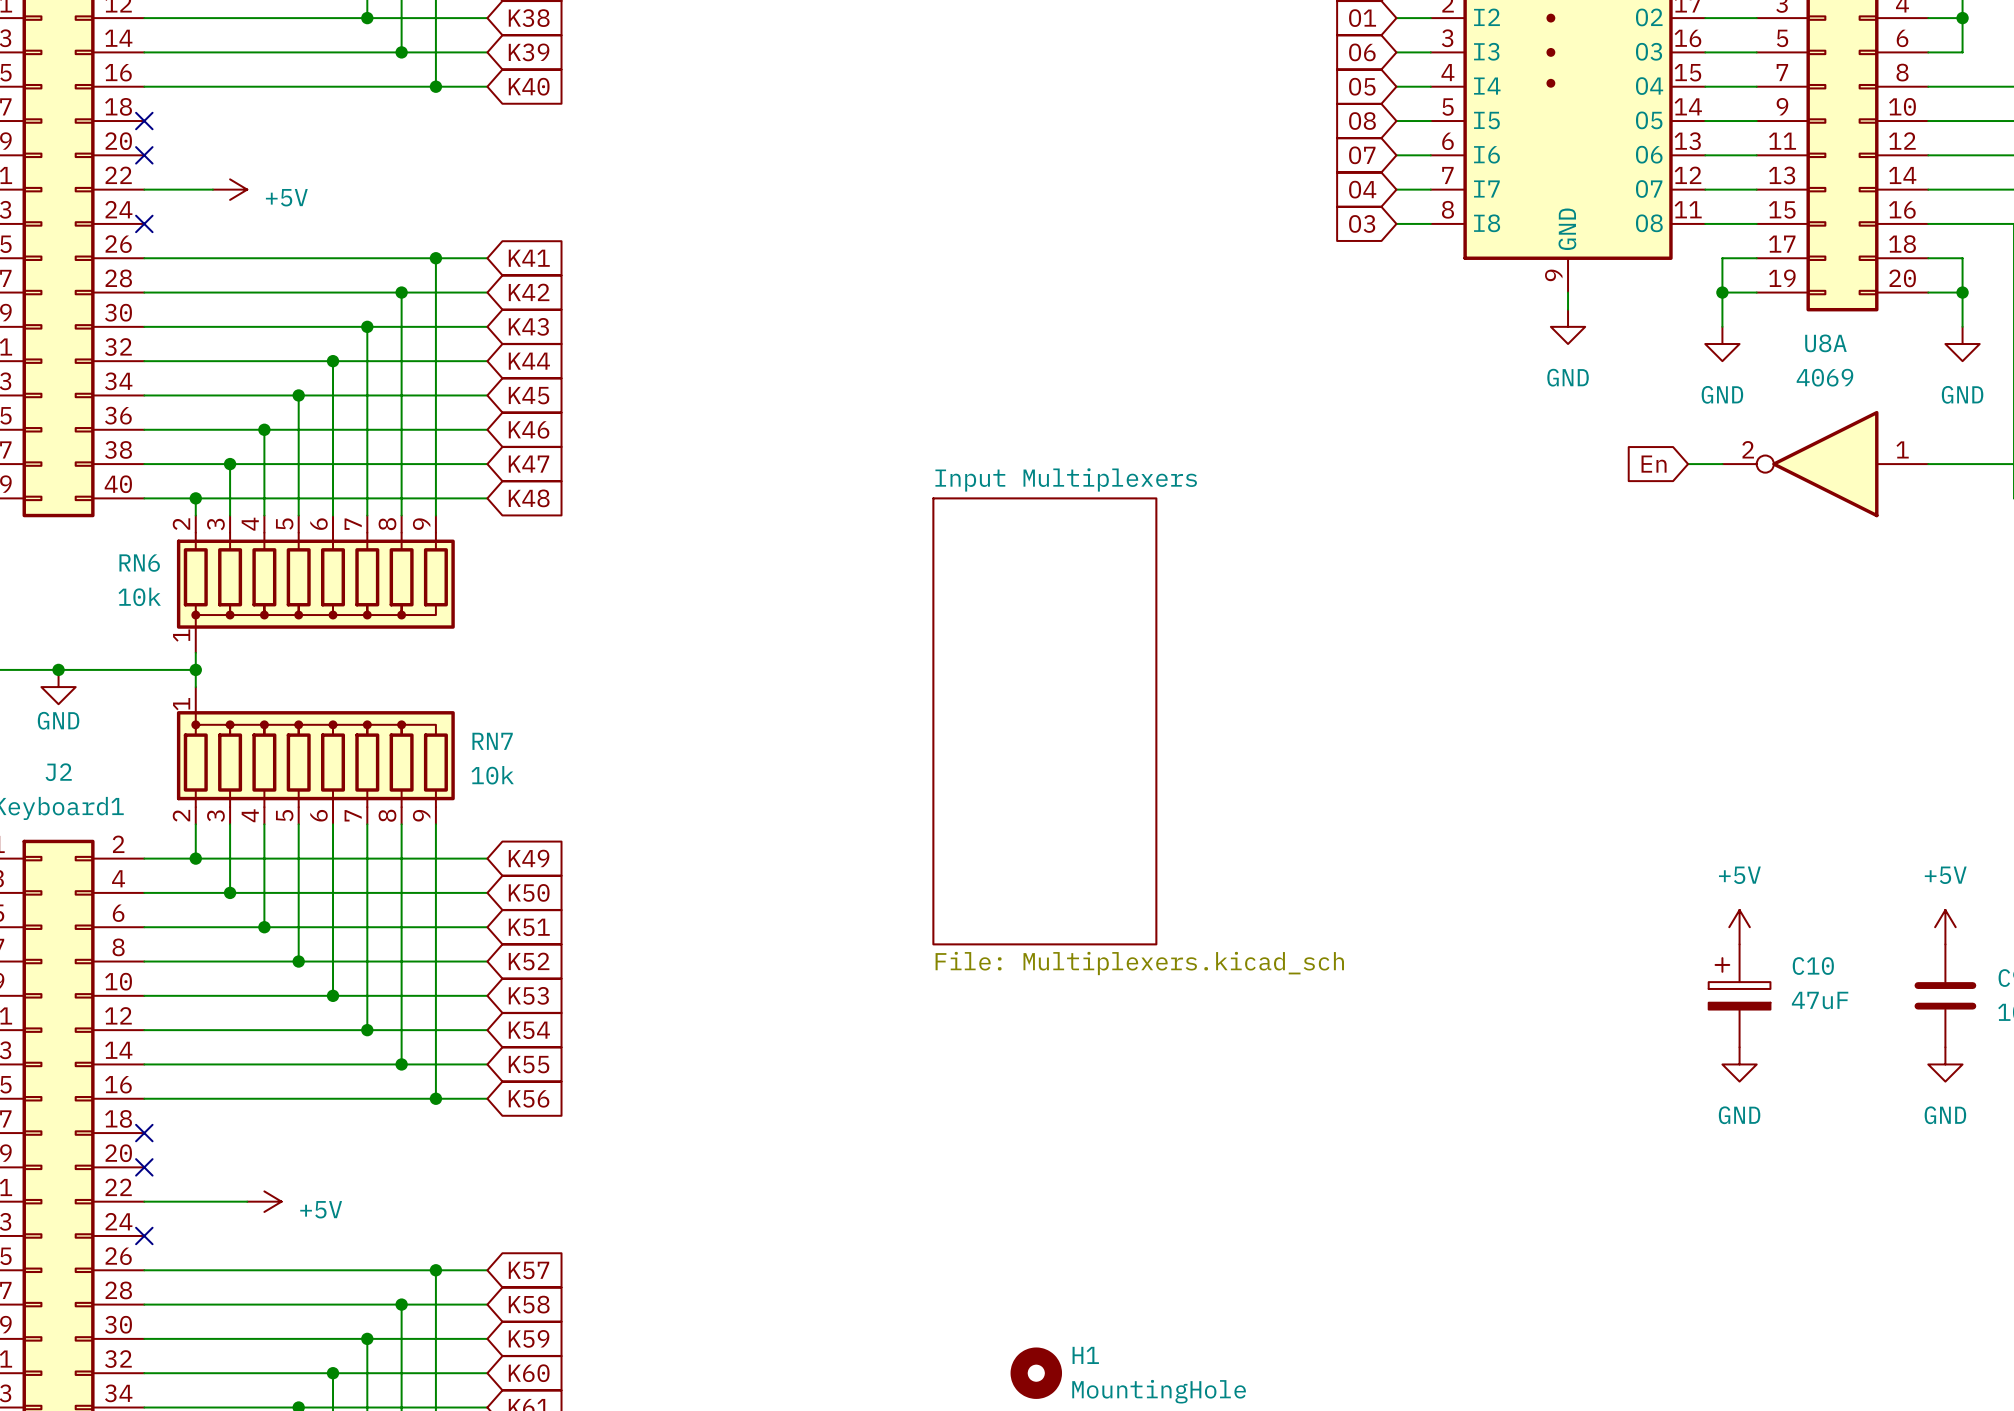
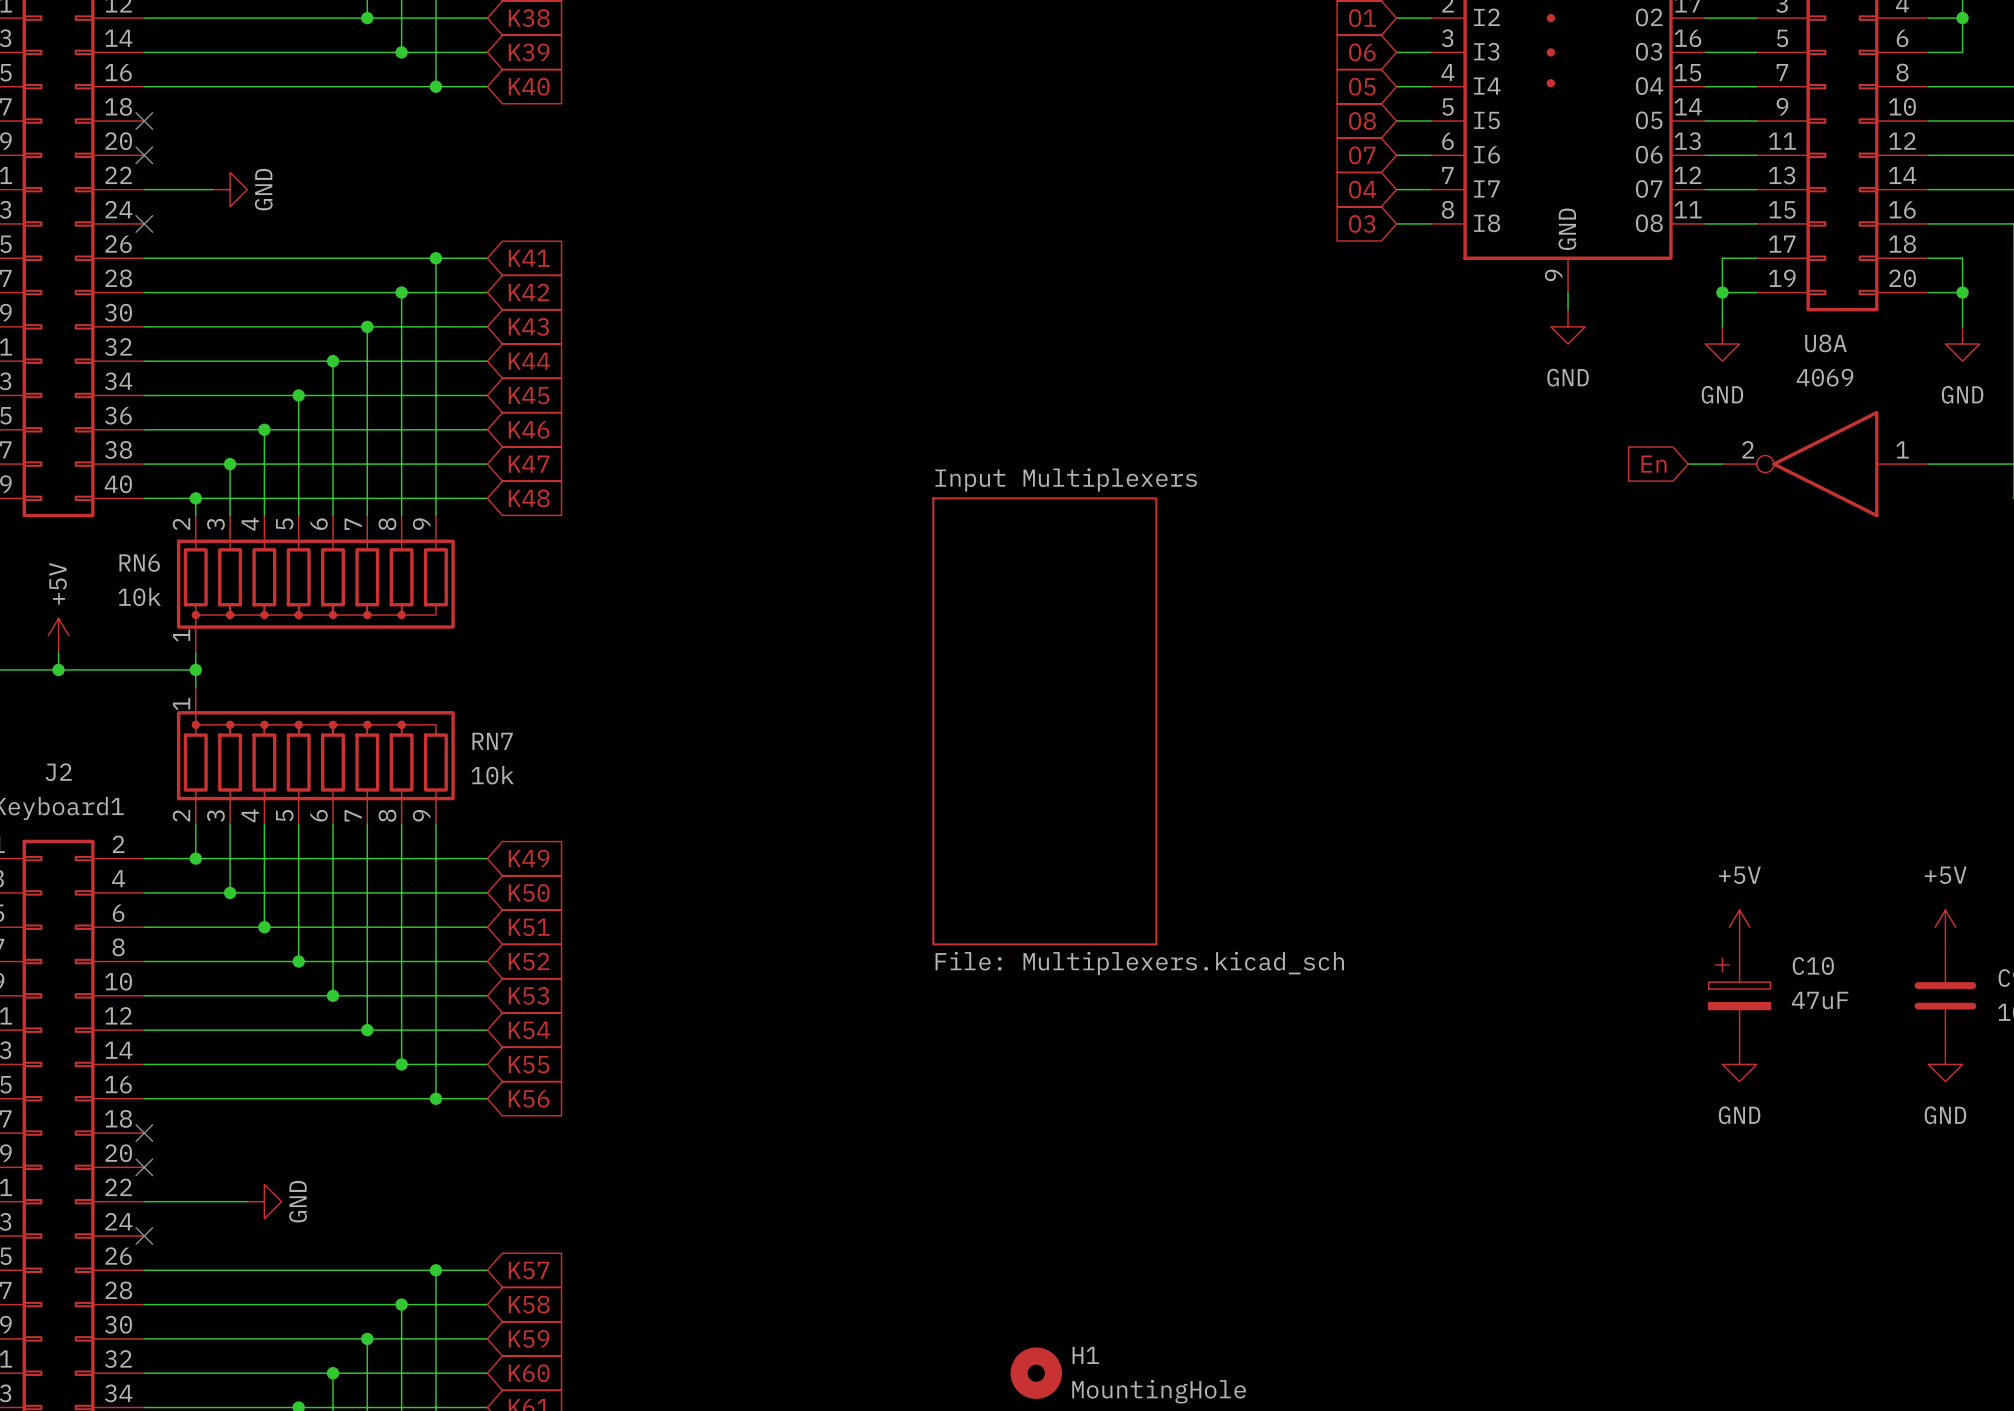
power symbol: +5V (230, 189) -> GND (230, 189)
power symbol: none -> +5V (58, 635)
wire: none -> (58, 652) (58, 669)
power symbol: GND (58, 687) -> none
power symbol: +5V (264, 1201) -> GND (264, 1201)

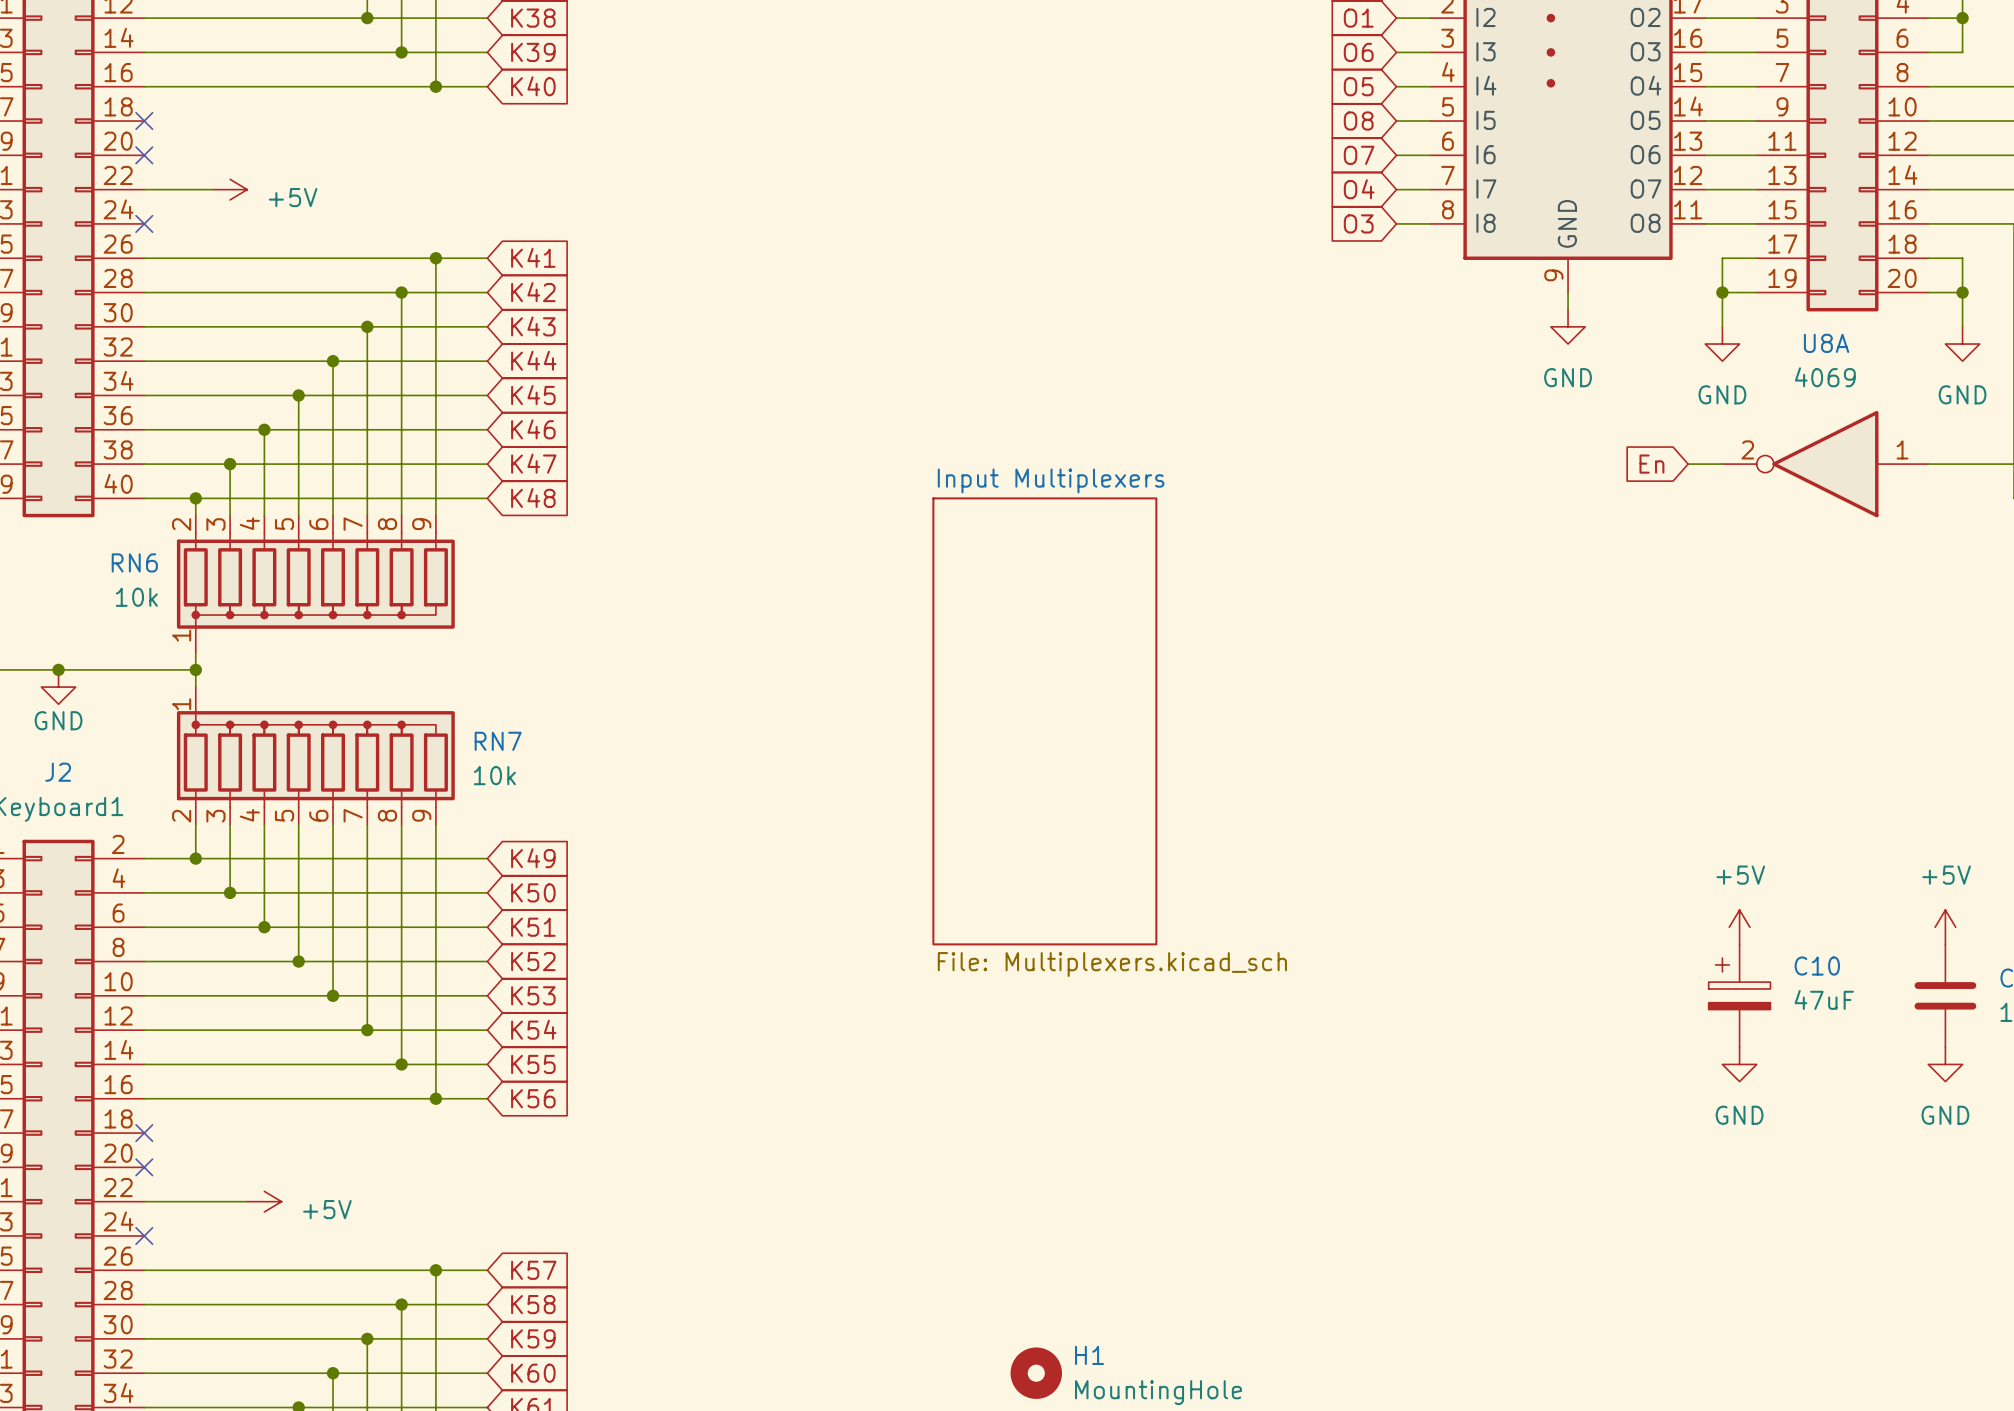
power symbol: GND (230, 189) -> +5V (230, 189)
power symbol: +5V (58, 635) -> none
wire: (58, 652) (58, 669) -> none
power symbol: none -> GND (58, 687)
power symbol: GND (264, 1201) -> +5V (264, 1201)

